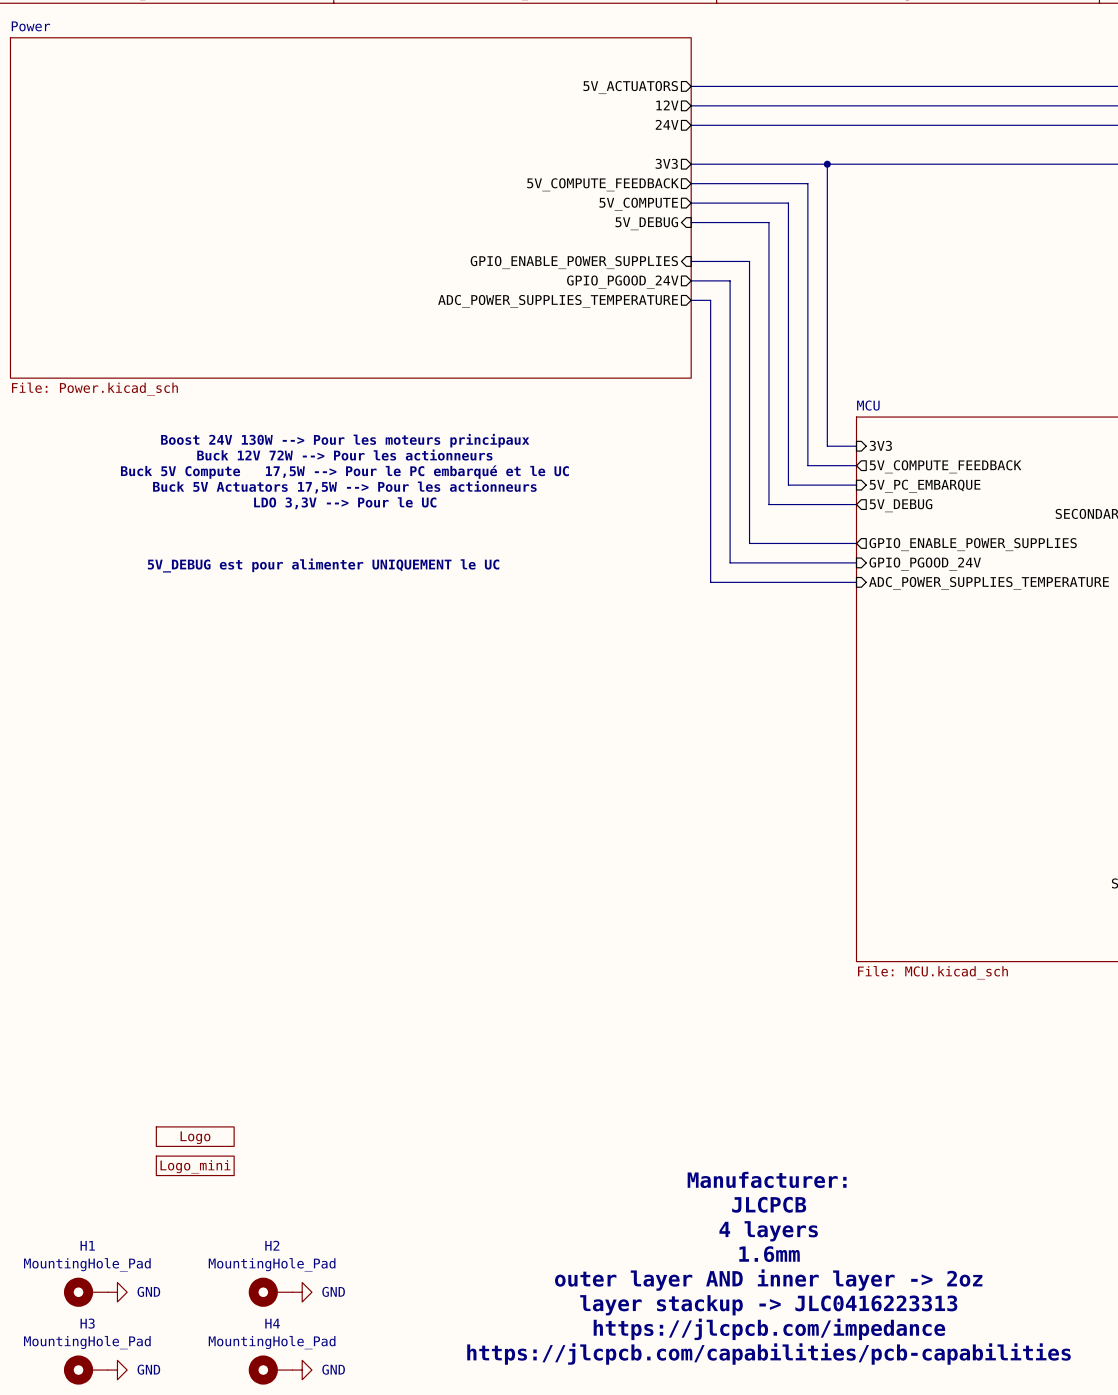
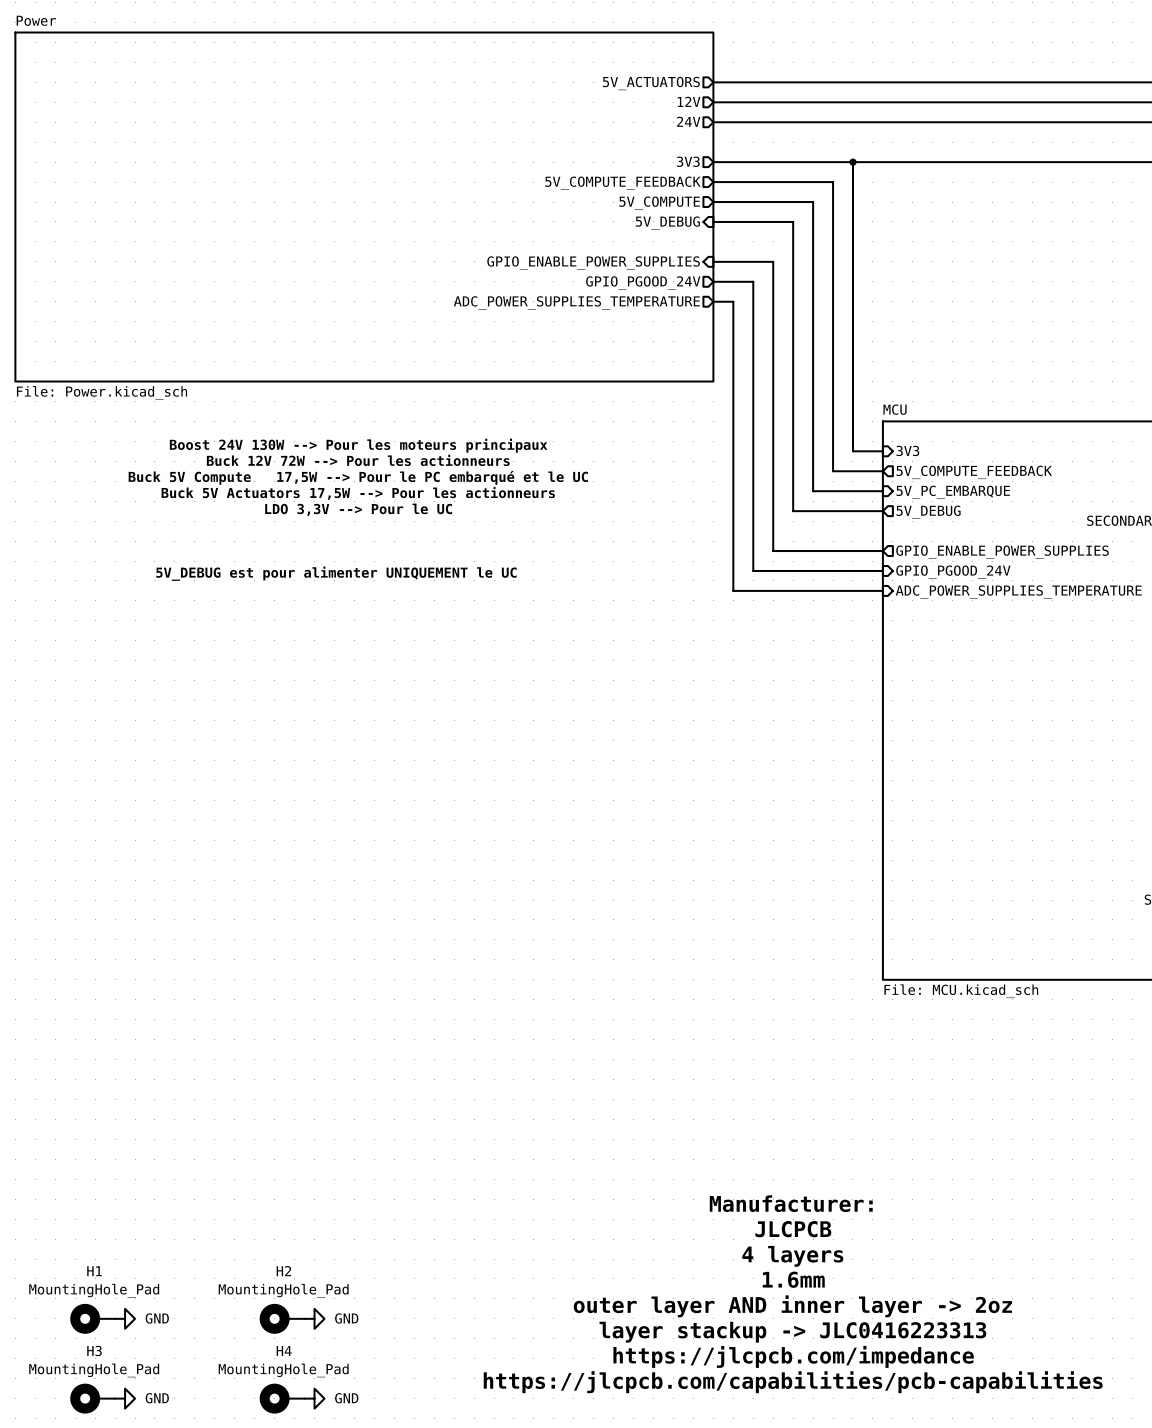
part: (195, 1136) -> none
part: (195, 1165) -> none

